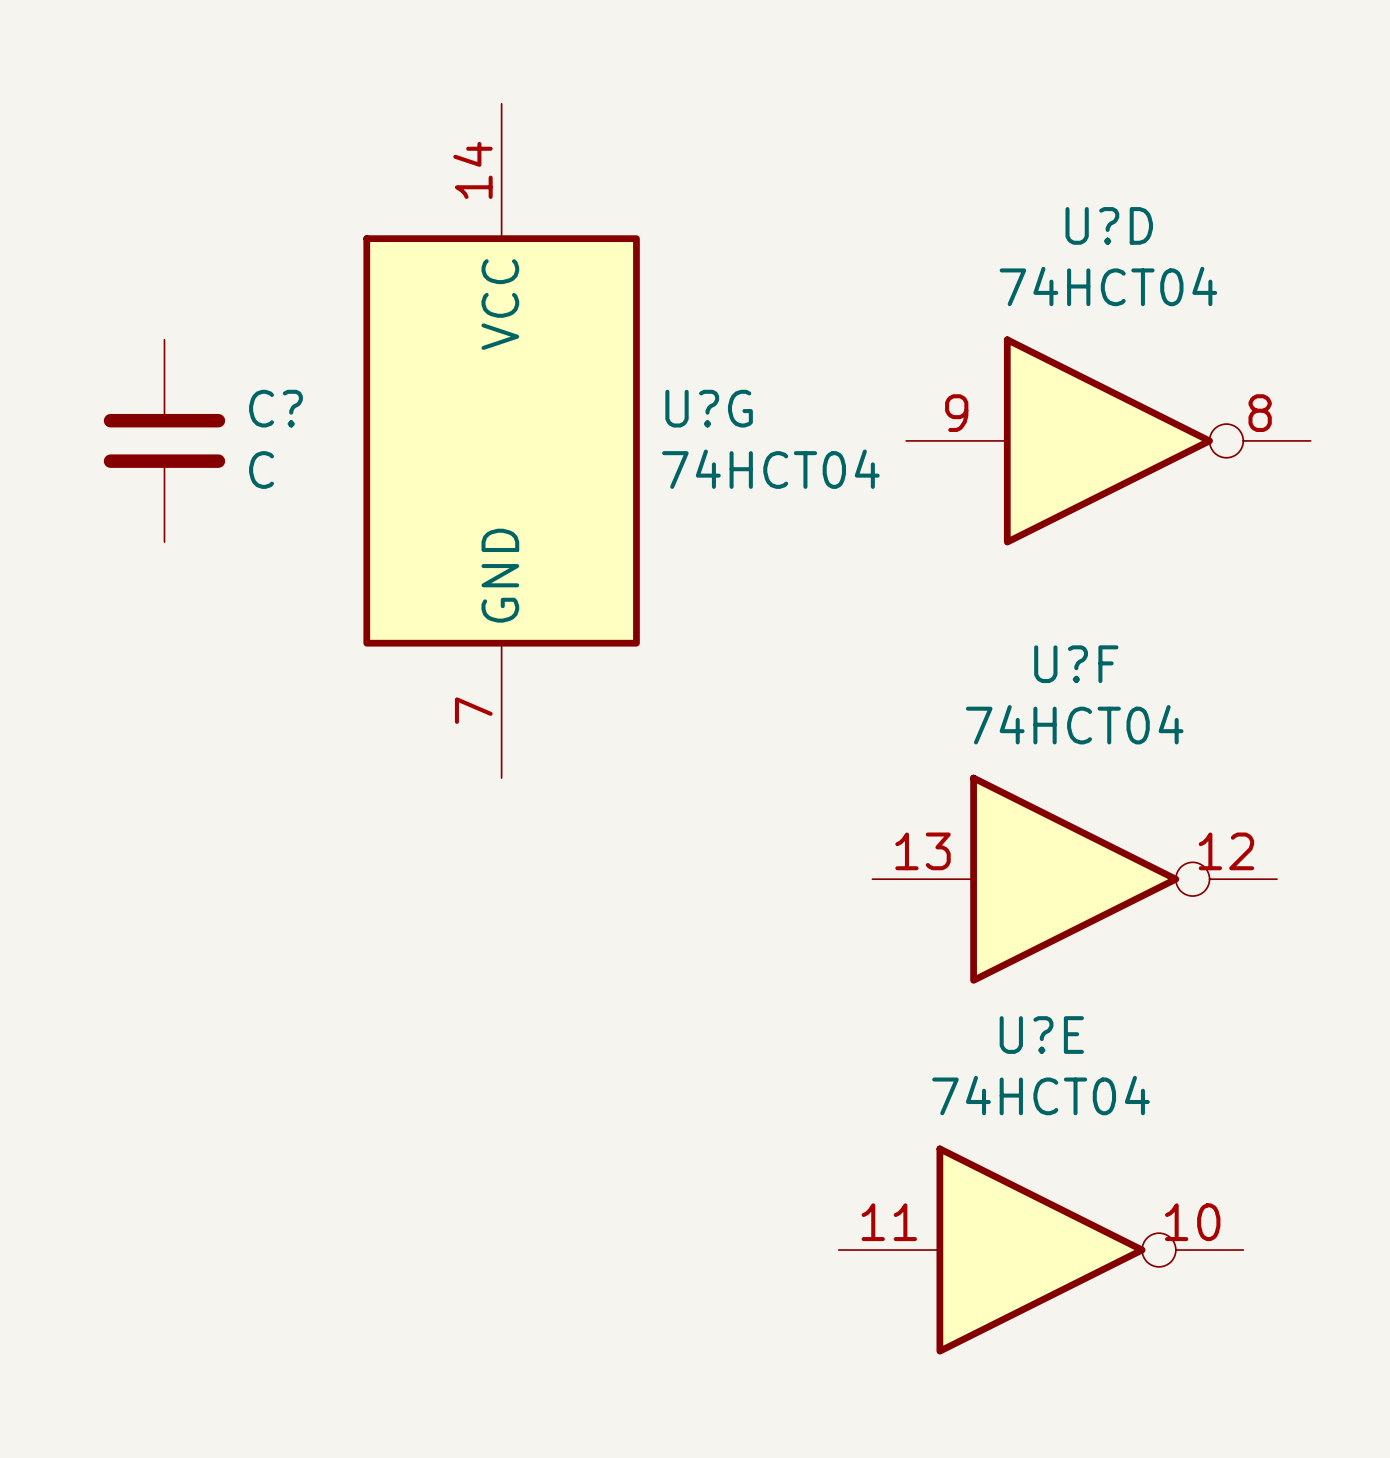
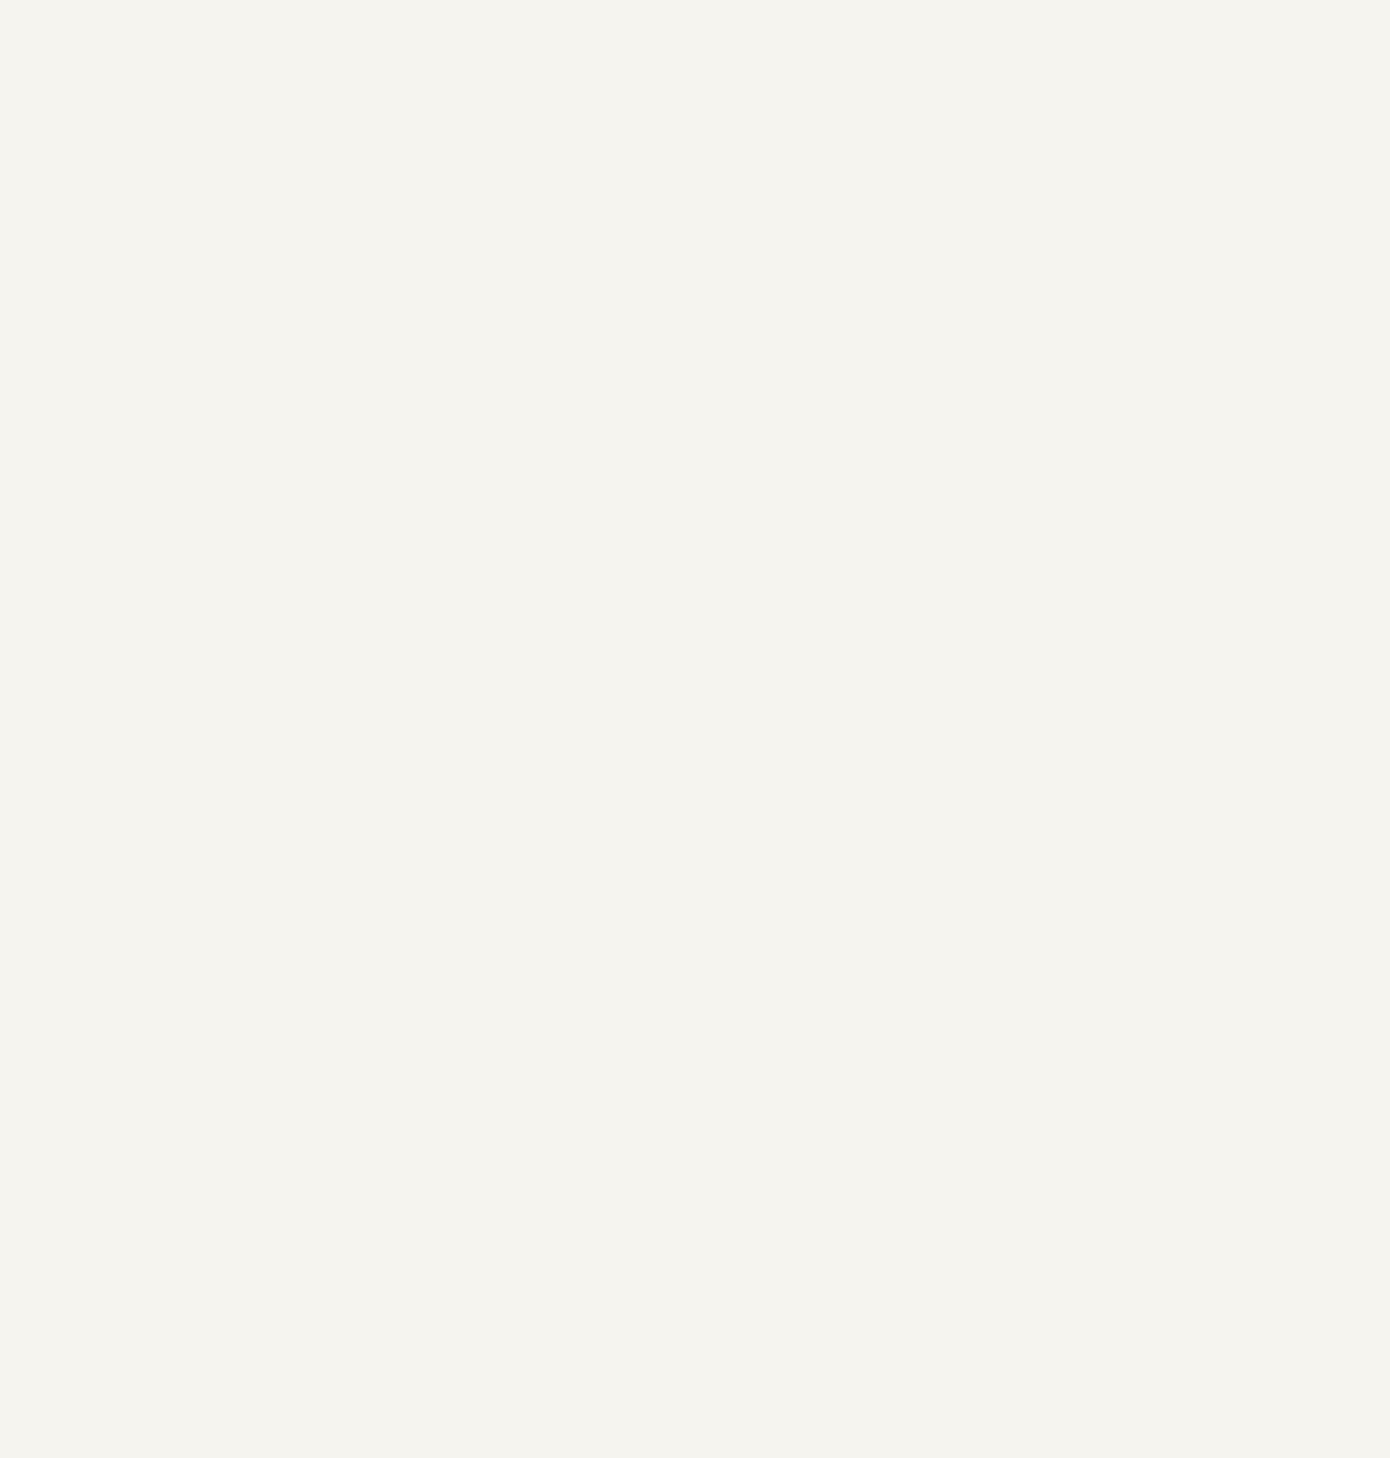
C?: C (164, 440) -> none
U?G: 74HCT04 (501, 440) -> none
U?D: 74HCT04 (1108, 440) -> none
U?F: 74HCT04 (1074, 879) -> none
U?E: 74HCT04 (1041, 1250) -> none

